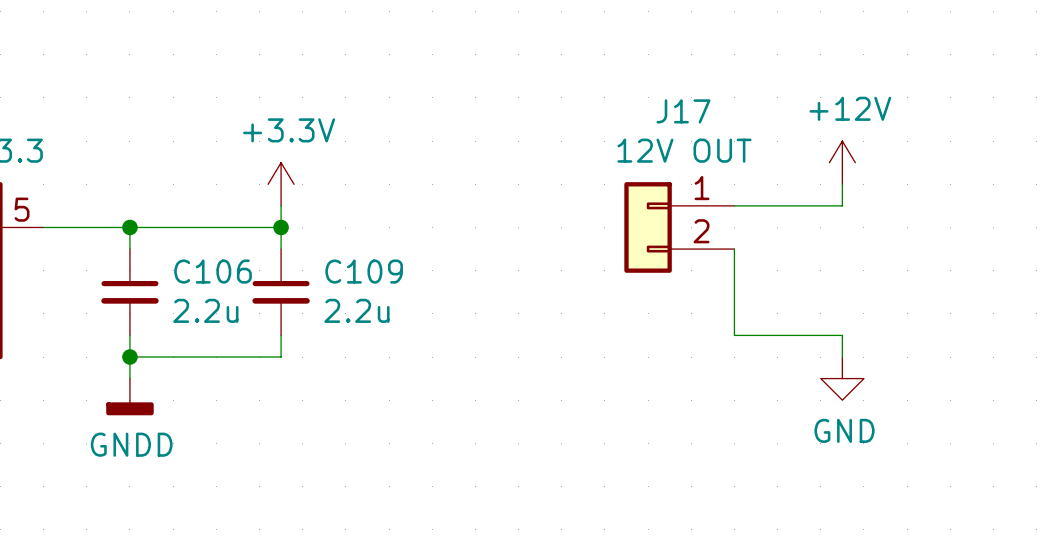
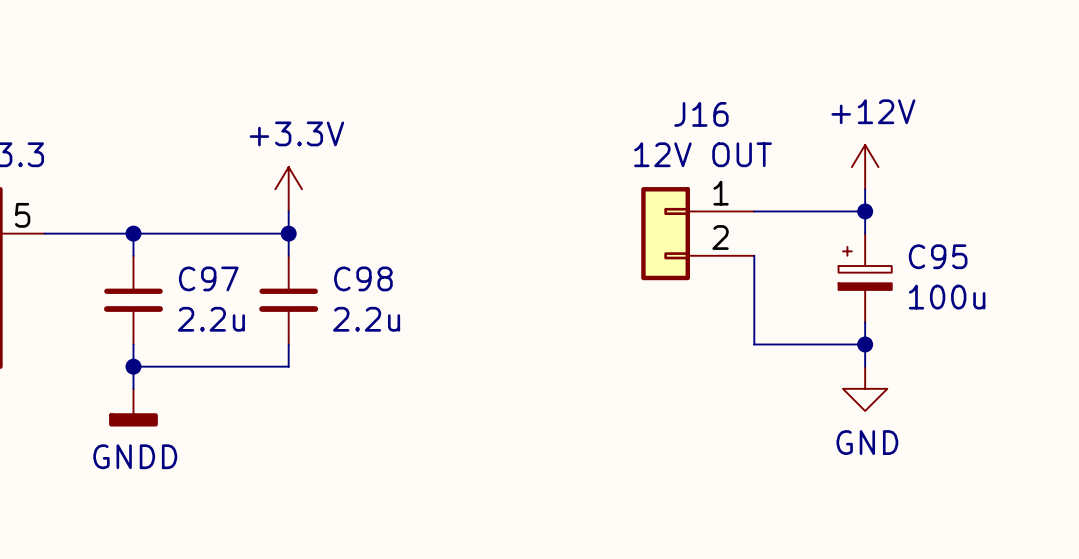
J17 name: J17 (683, 111) -> J16 (701, 114)
wire: none -> (865, 211) (865, 233)
junction: none -> (865, 211)
C95: none -> 100u (865, 277)
C106 name: C106 (213, 271) -> C97 (208, 278)
C109 name: C109 (364, 271) -> C98 (363, 278)
wire: none -> (865, 322) (865, 344)
junction: none -> (865, 344)

